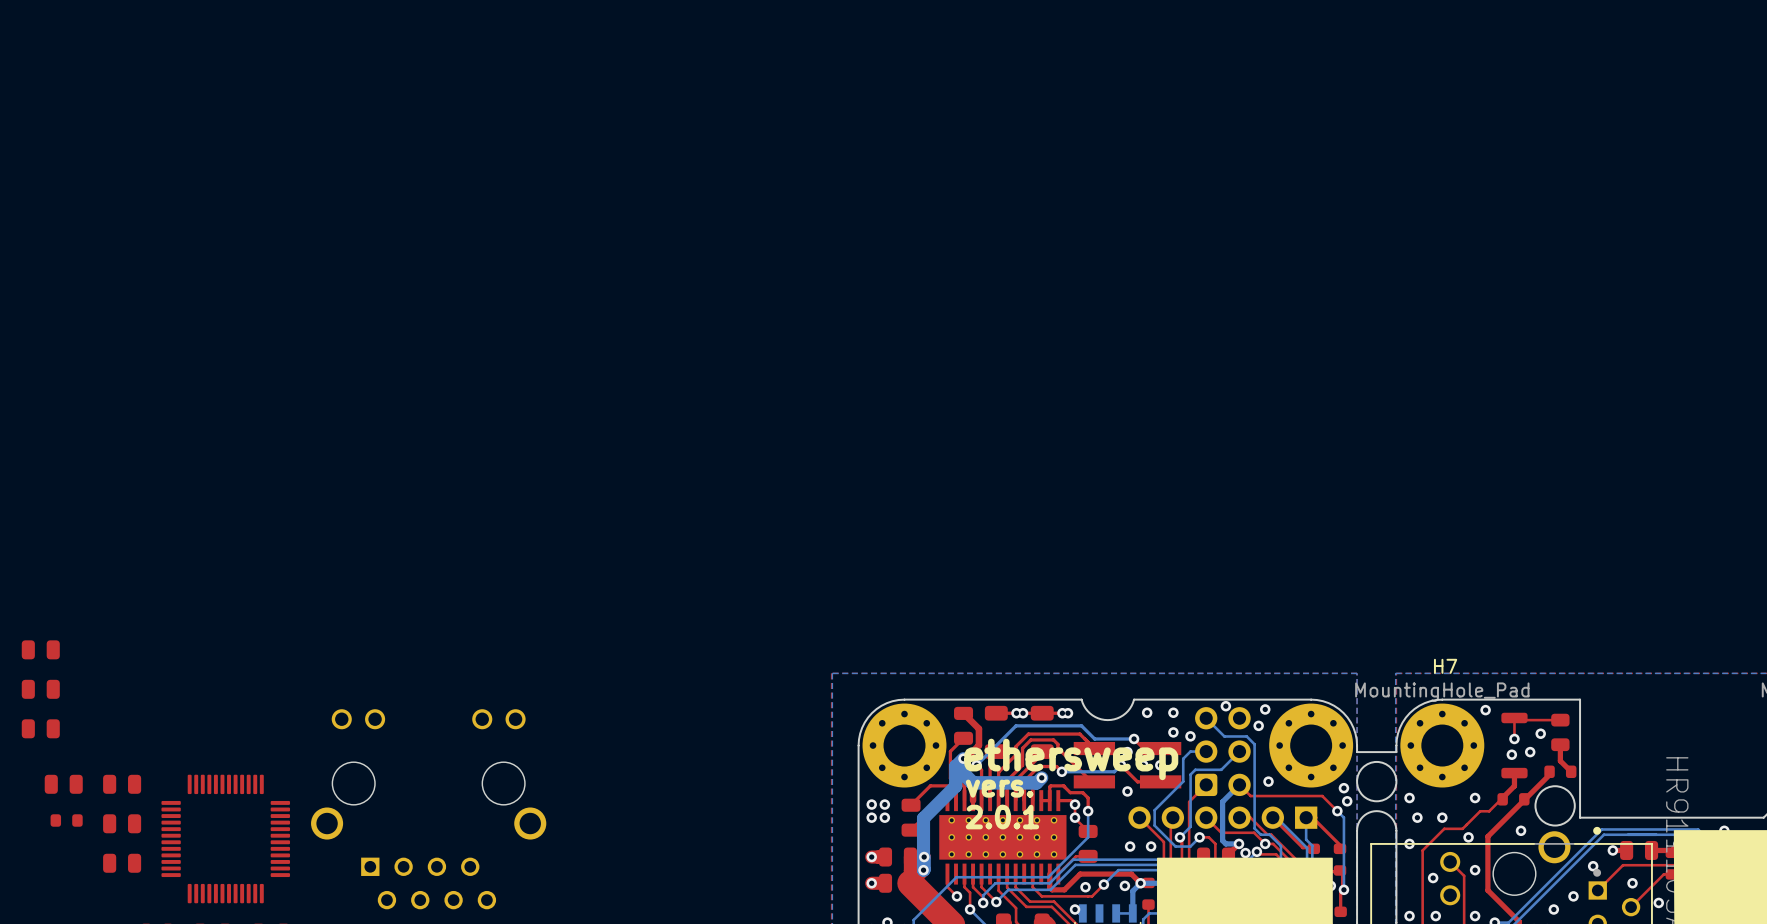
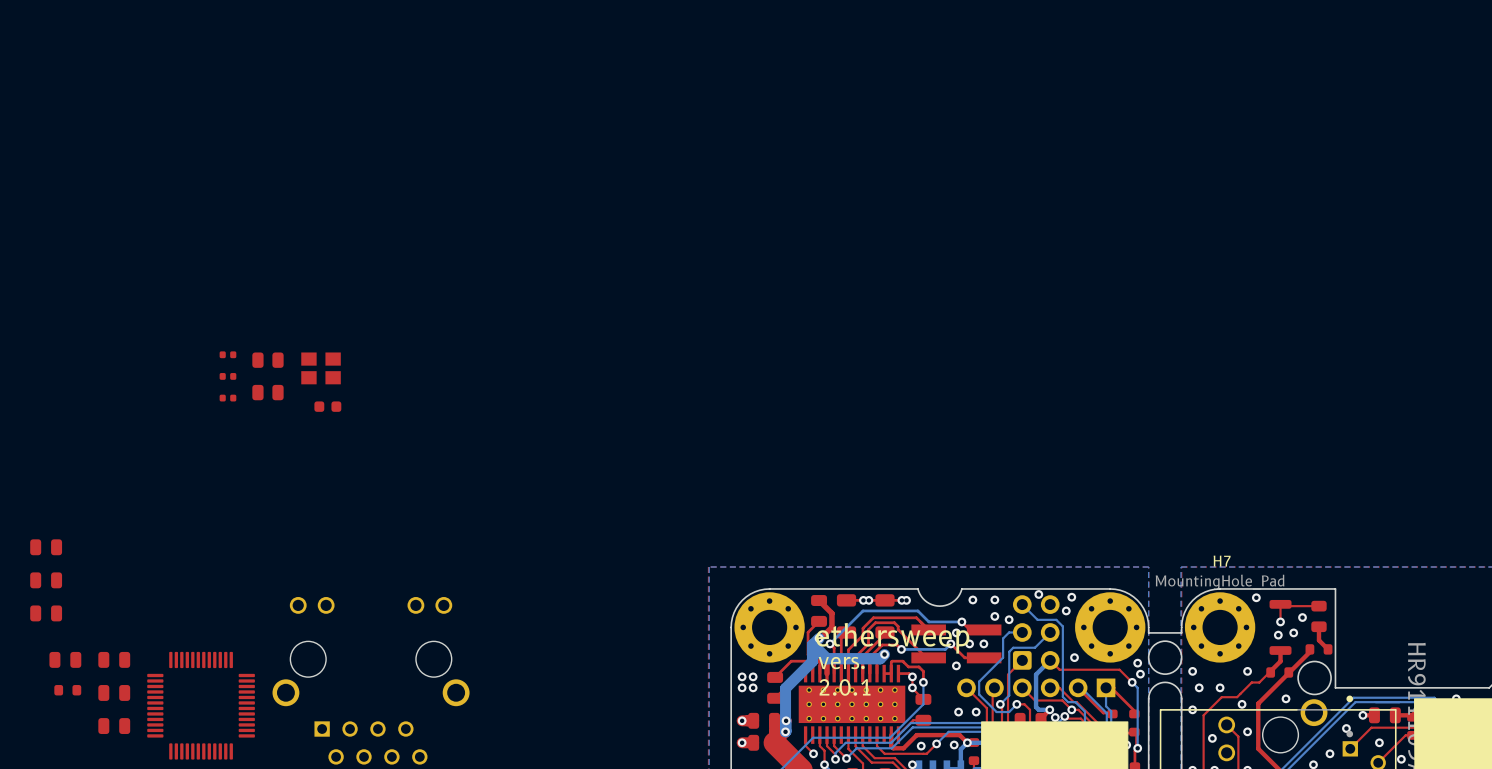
part: none -> (227, 354)
part: none -> (267, 360)
part: none -> (321, 368)
part: none -> (227, 376)
part: none -> (267, 392)
part: none -> (227, 398)
part: none -> (327, 406)

